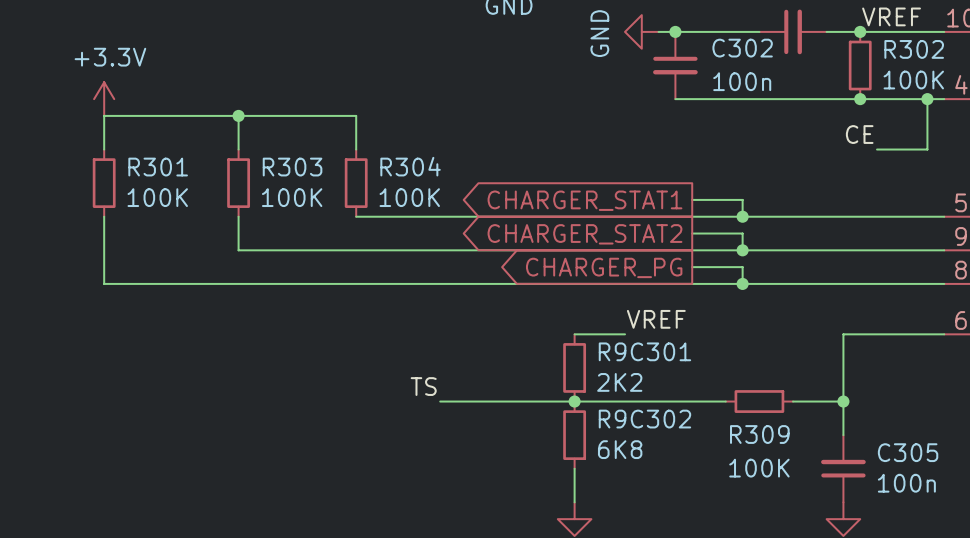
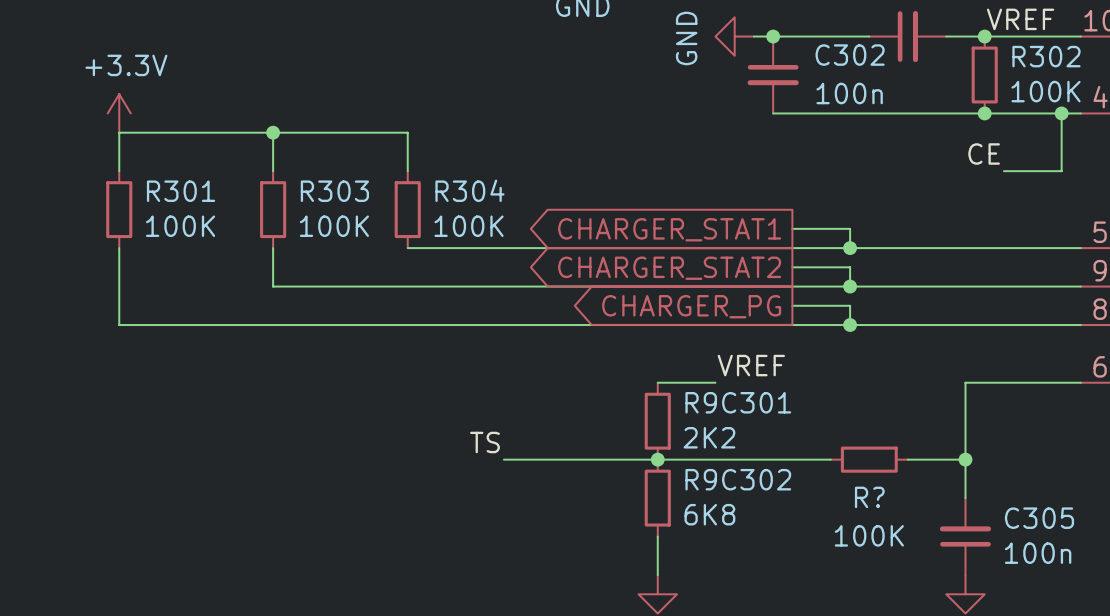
R309 name: R309 (759, 434) -> R? (869, 497)

